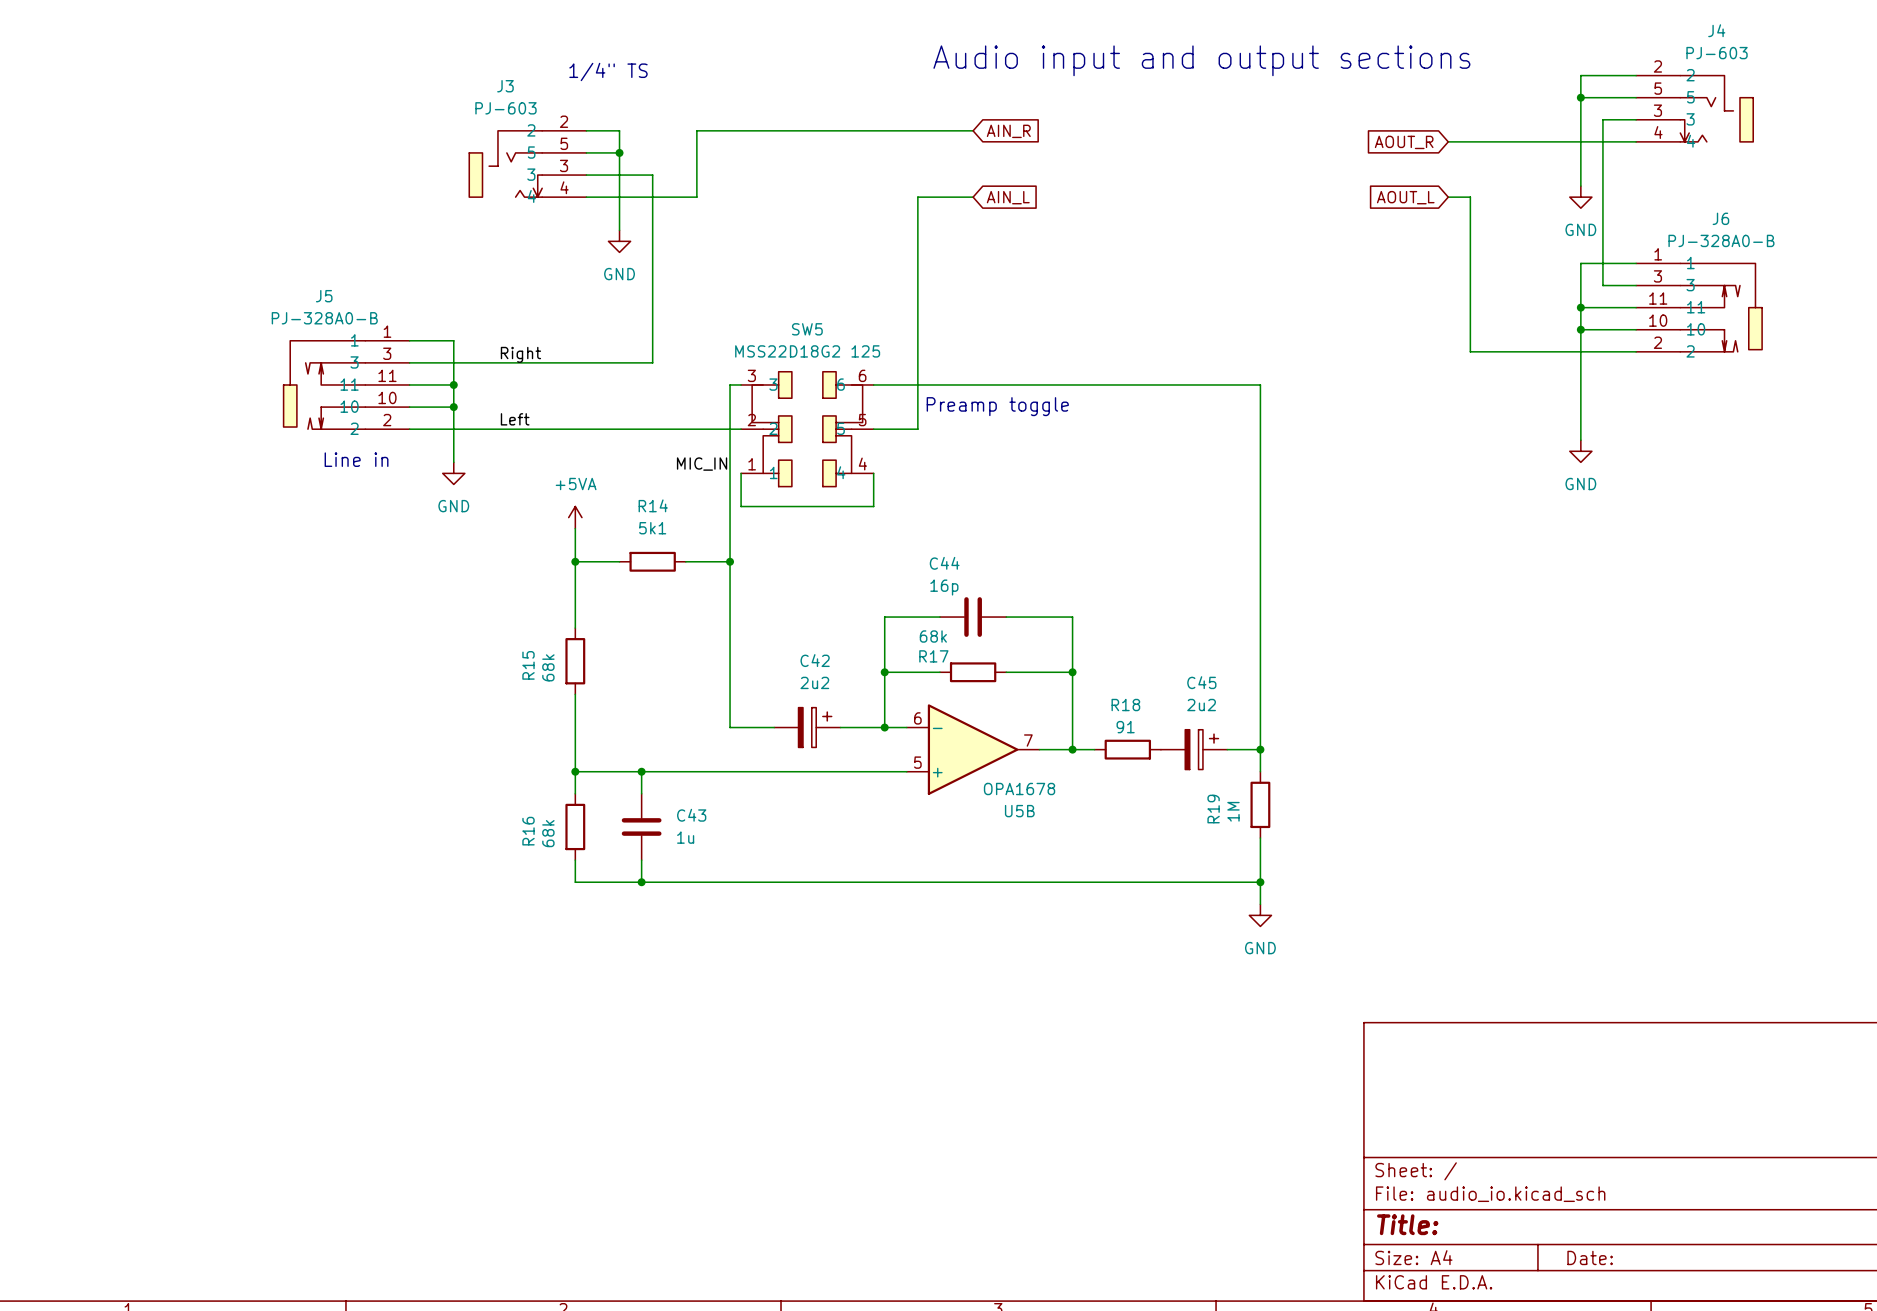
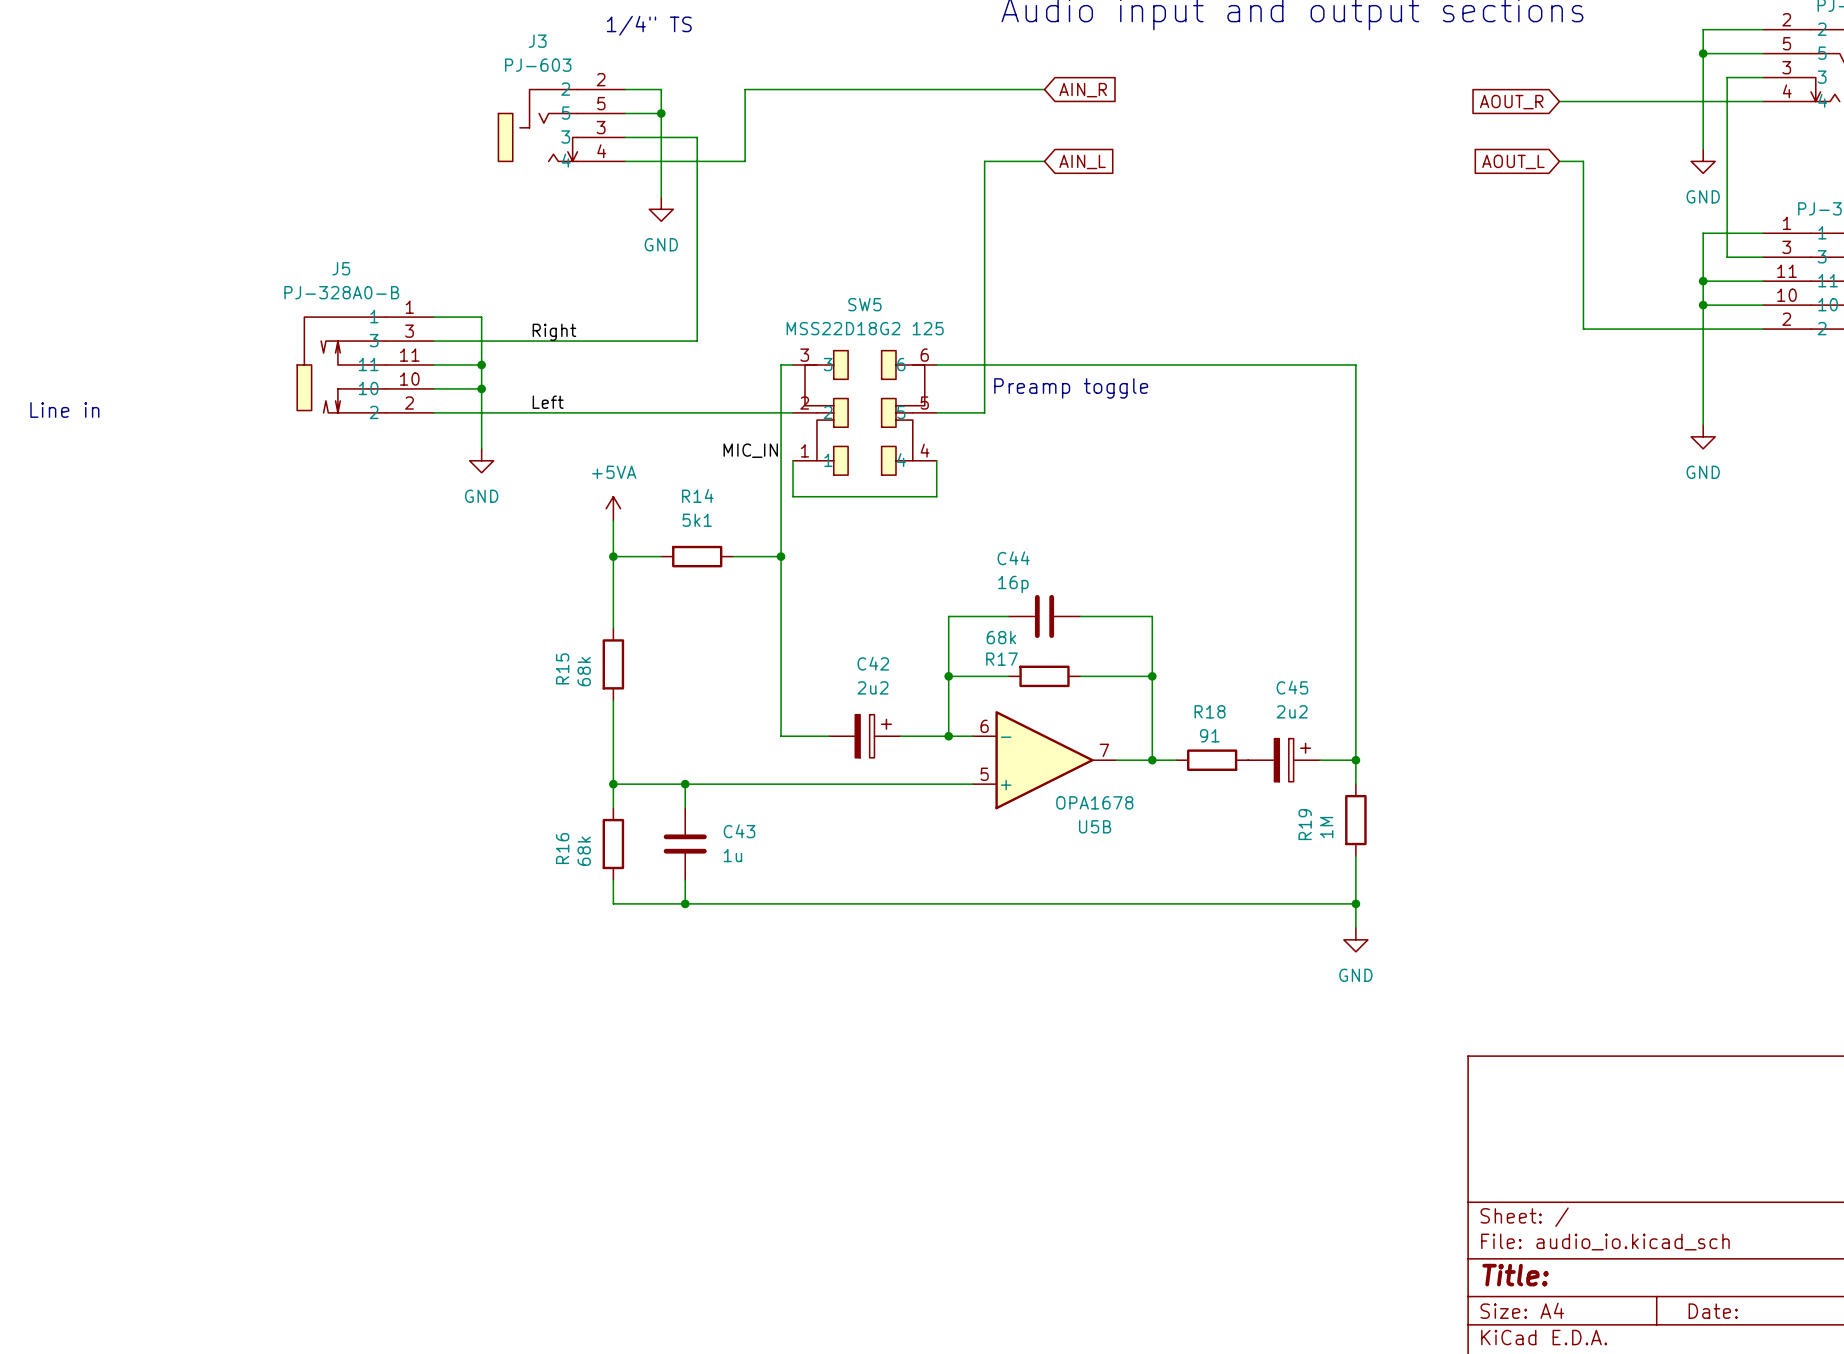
text: none -> Line in (64, 410)
text: Line in (356, 459) -> none

